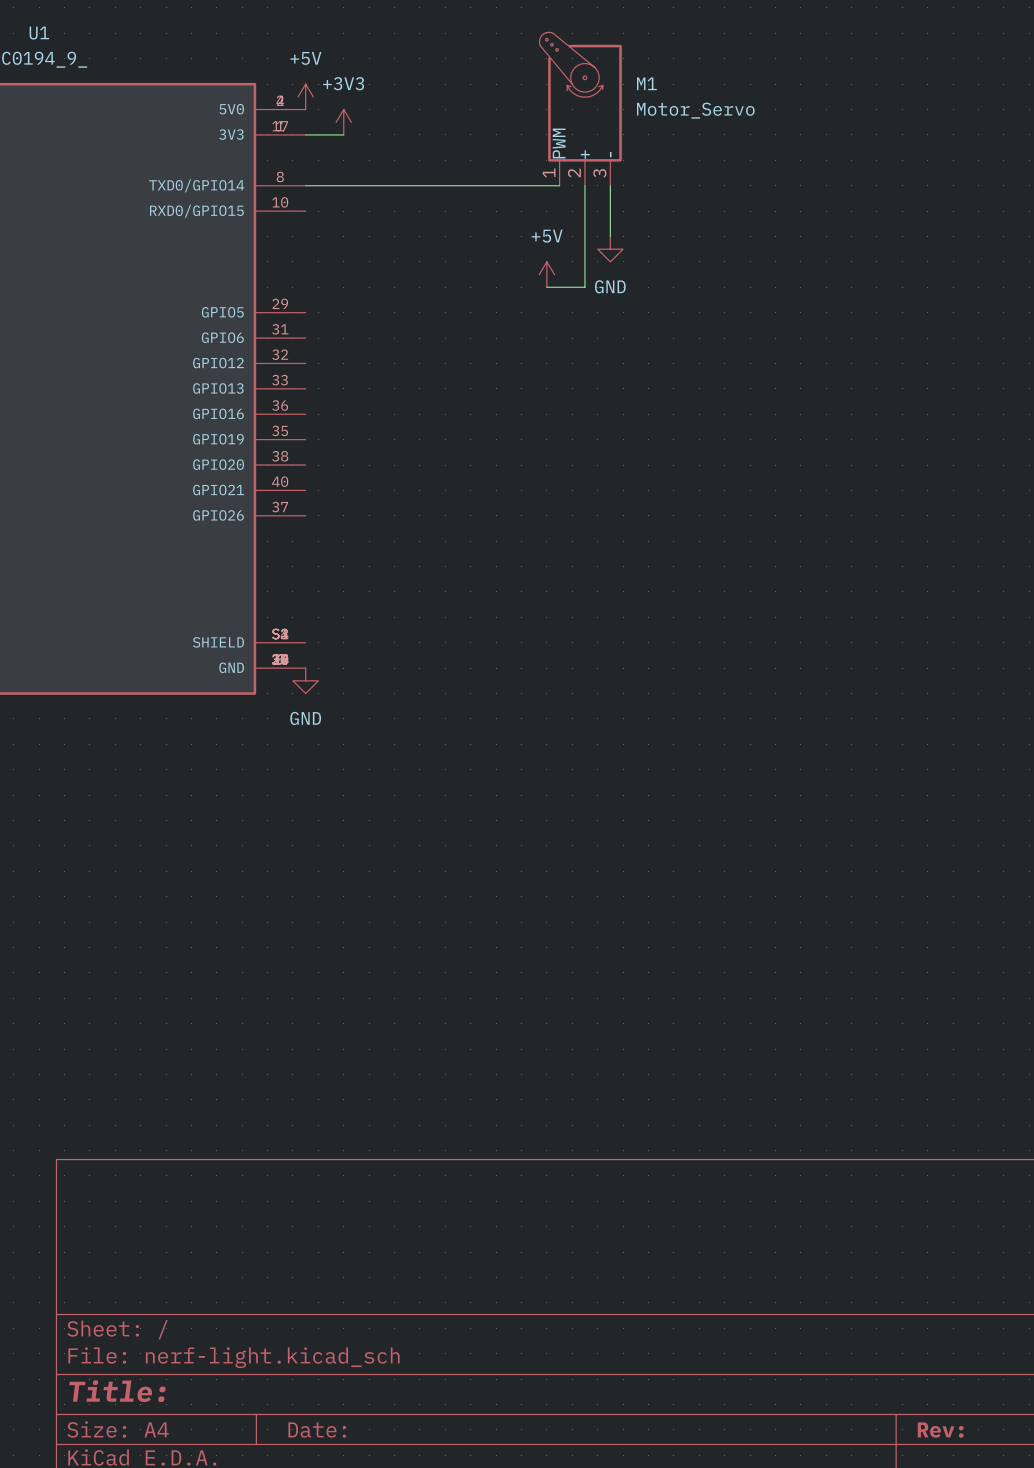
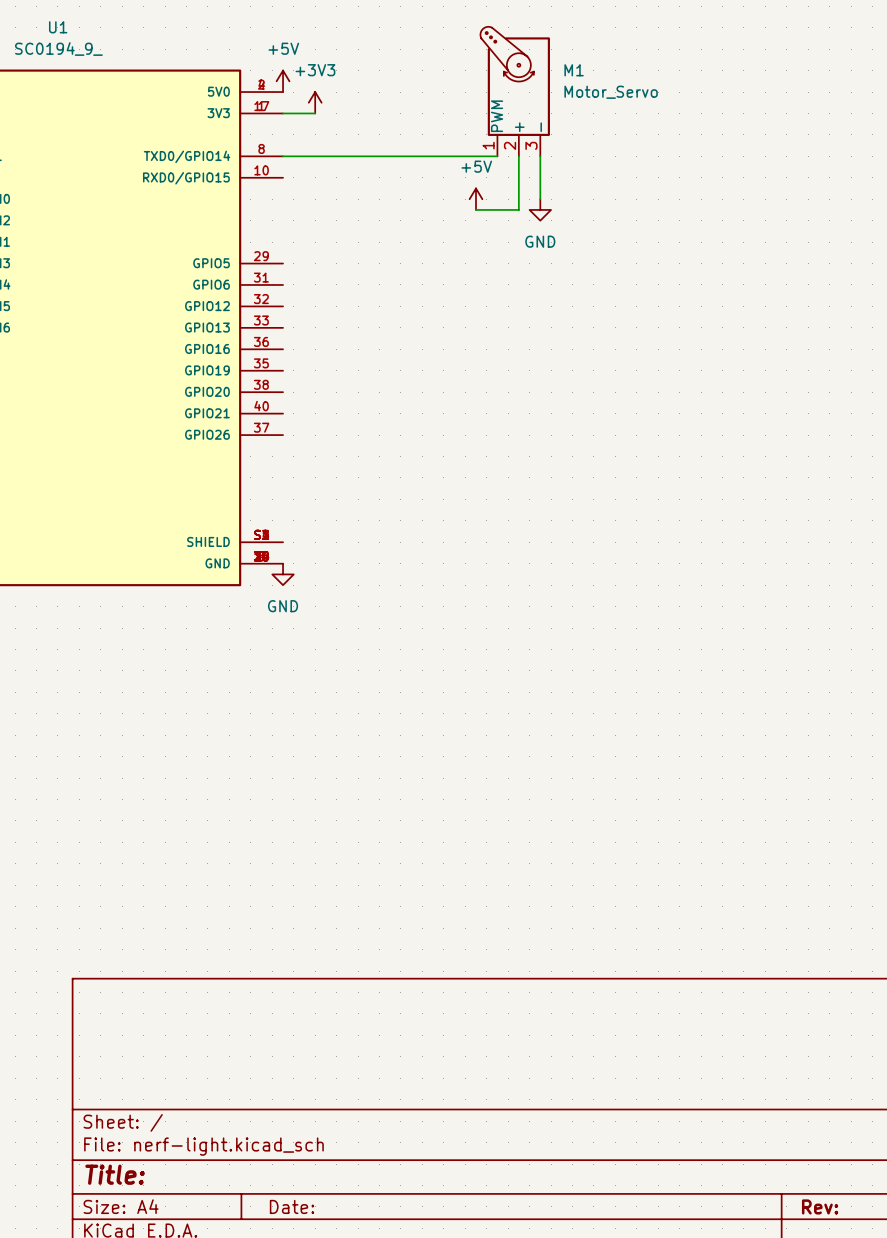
wire: (584, 249) (584, 287) (546, 287) -> (518, 209) (475, 209)
power symbol position: +5V (546, 274) -> +5V (475, 199)

